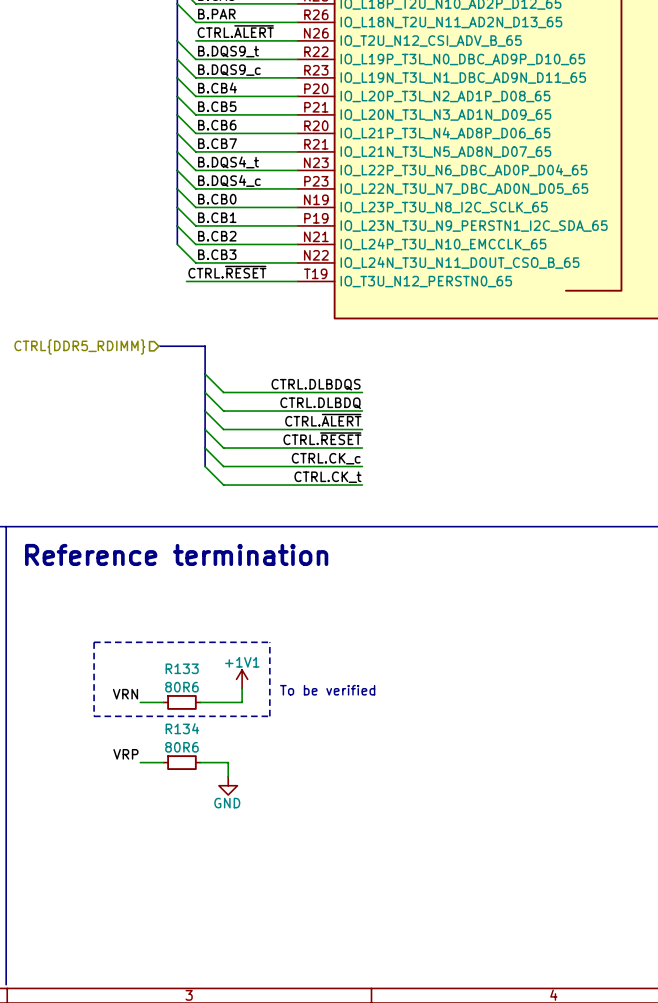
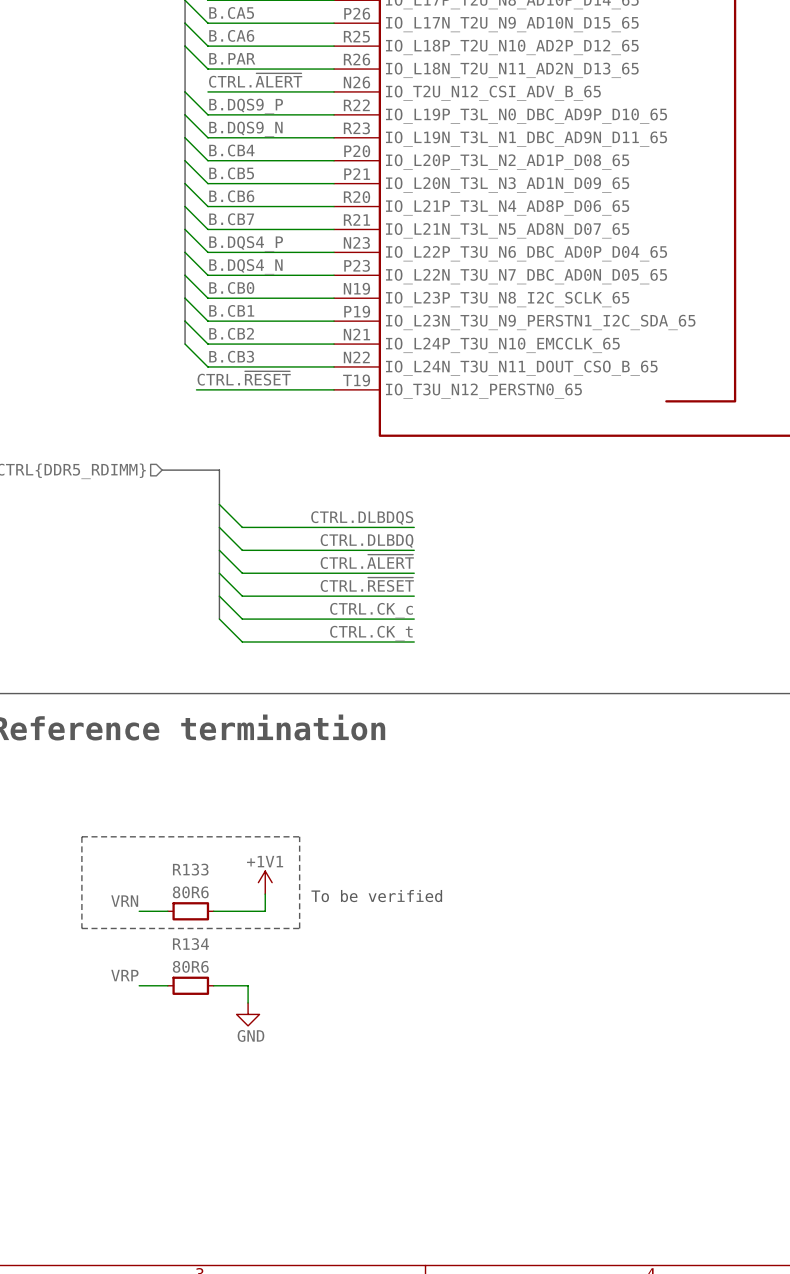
label: B.DQS9_t (228, 51) -> B.DQS9_P (246, 106)
label: B.DQS9_c (229, 70) -> B.DQS9_N (245, 129)
label: B.DQS4_t (228, 162) -> B.DQS4_P (246, 243)
label: B.DQS4_c (229, 180) -> B.DQS4_N (245, 266)

